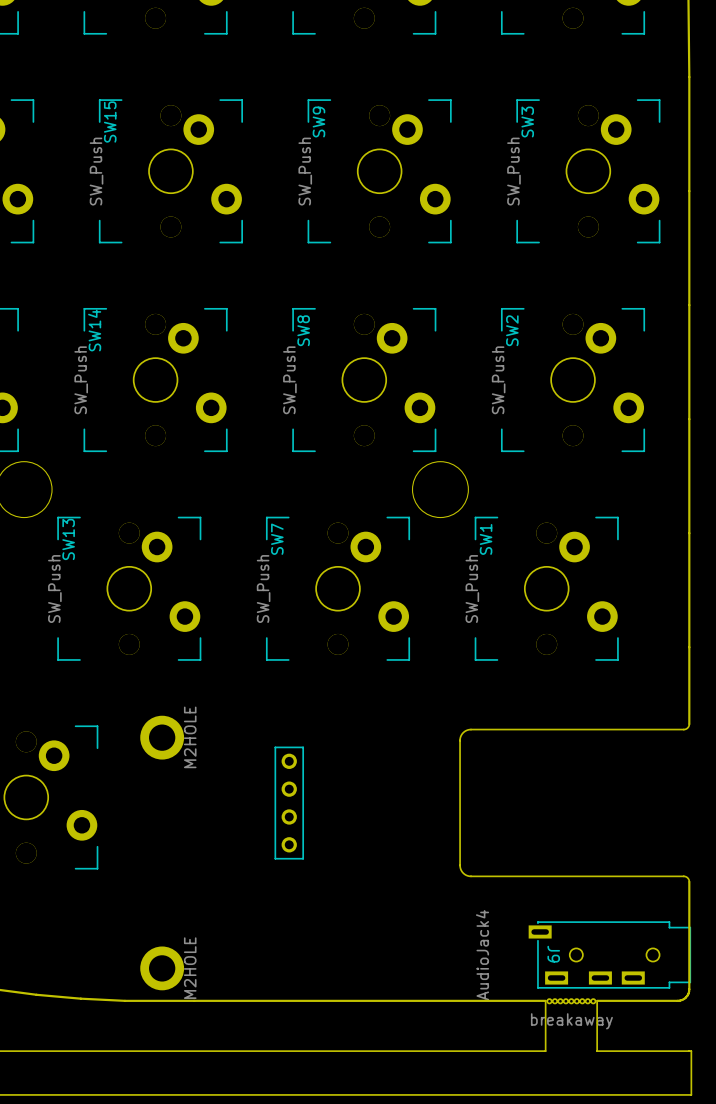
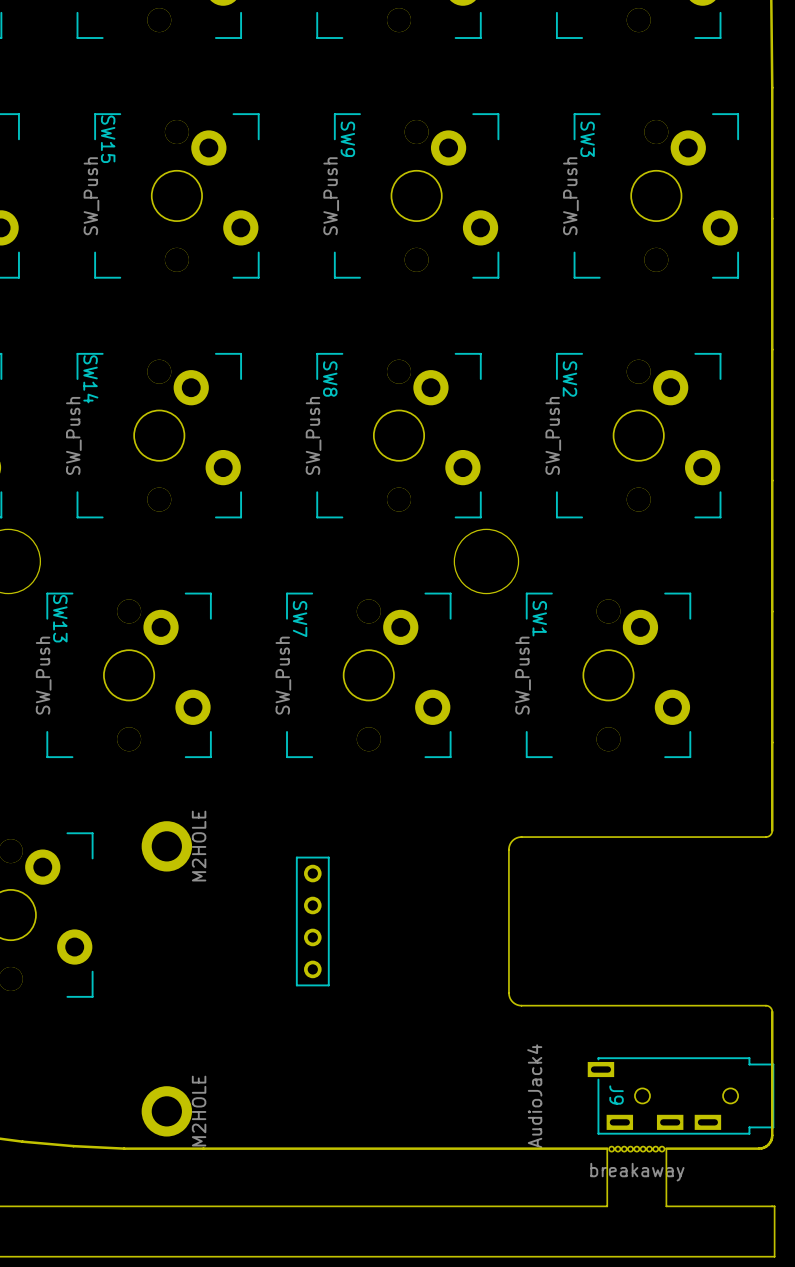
SW15 name rotation: 0° (110, 122) -> 180° (108, 139)
SW9 name rotation: 0° (318, 122) -> 180° (347, 139)
SW3 name rotation: 0° (527, 122) -> 180° (587, 139)
SW14 name rotation: 0° (94, 330) -> 180° (90, 379)
SW8 name rotation: 0° (303, 330) -> 180° (330, 379)
SW2 name rotation: 0° (512, 330) -> 180° (569, 379)
SW13 name rotation: 0° (68, 539) -> 180° (60, 618)
SW7 name rotation: 0° (277, 539) -> 180° (300, 619)
SW1 name rotation: 0° (486, 539) -> 180° (539, 618)

